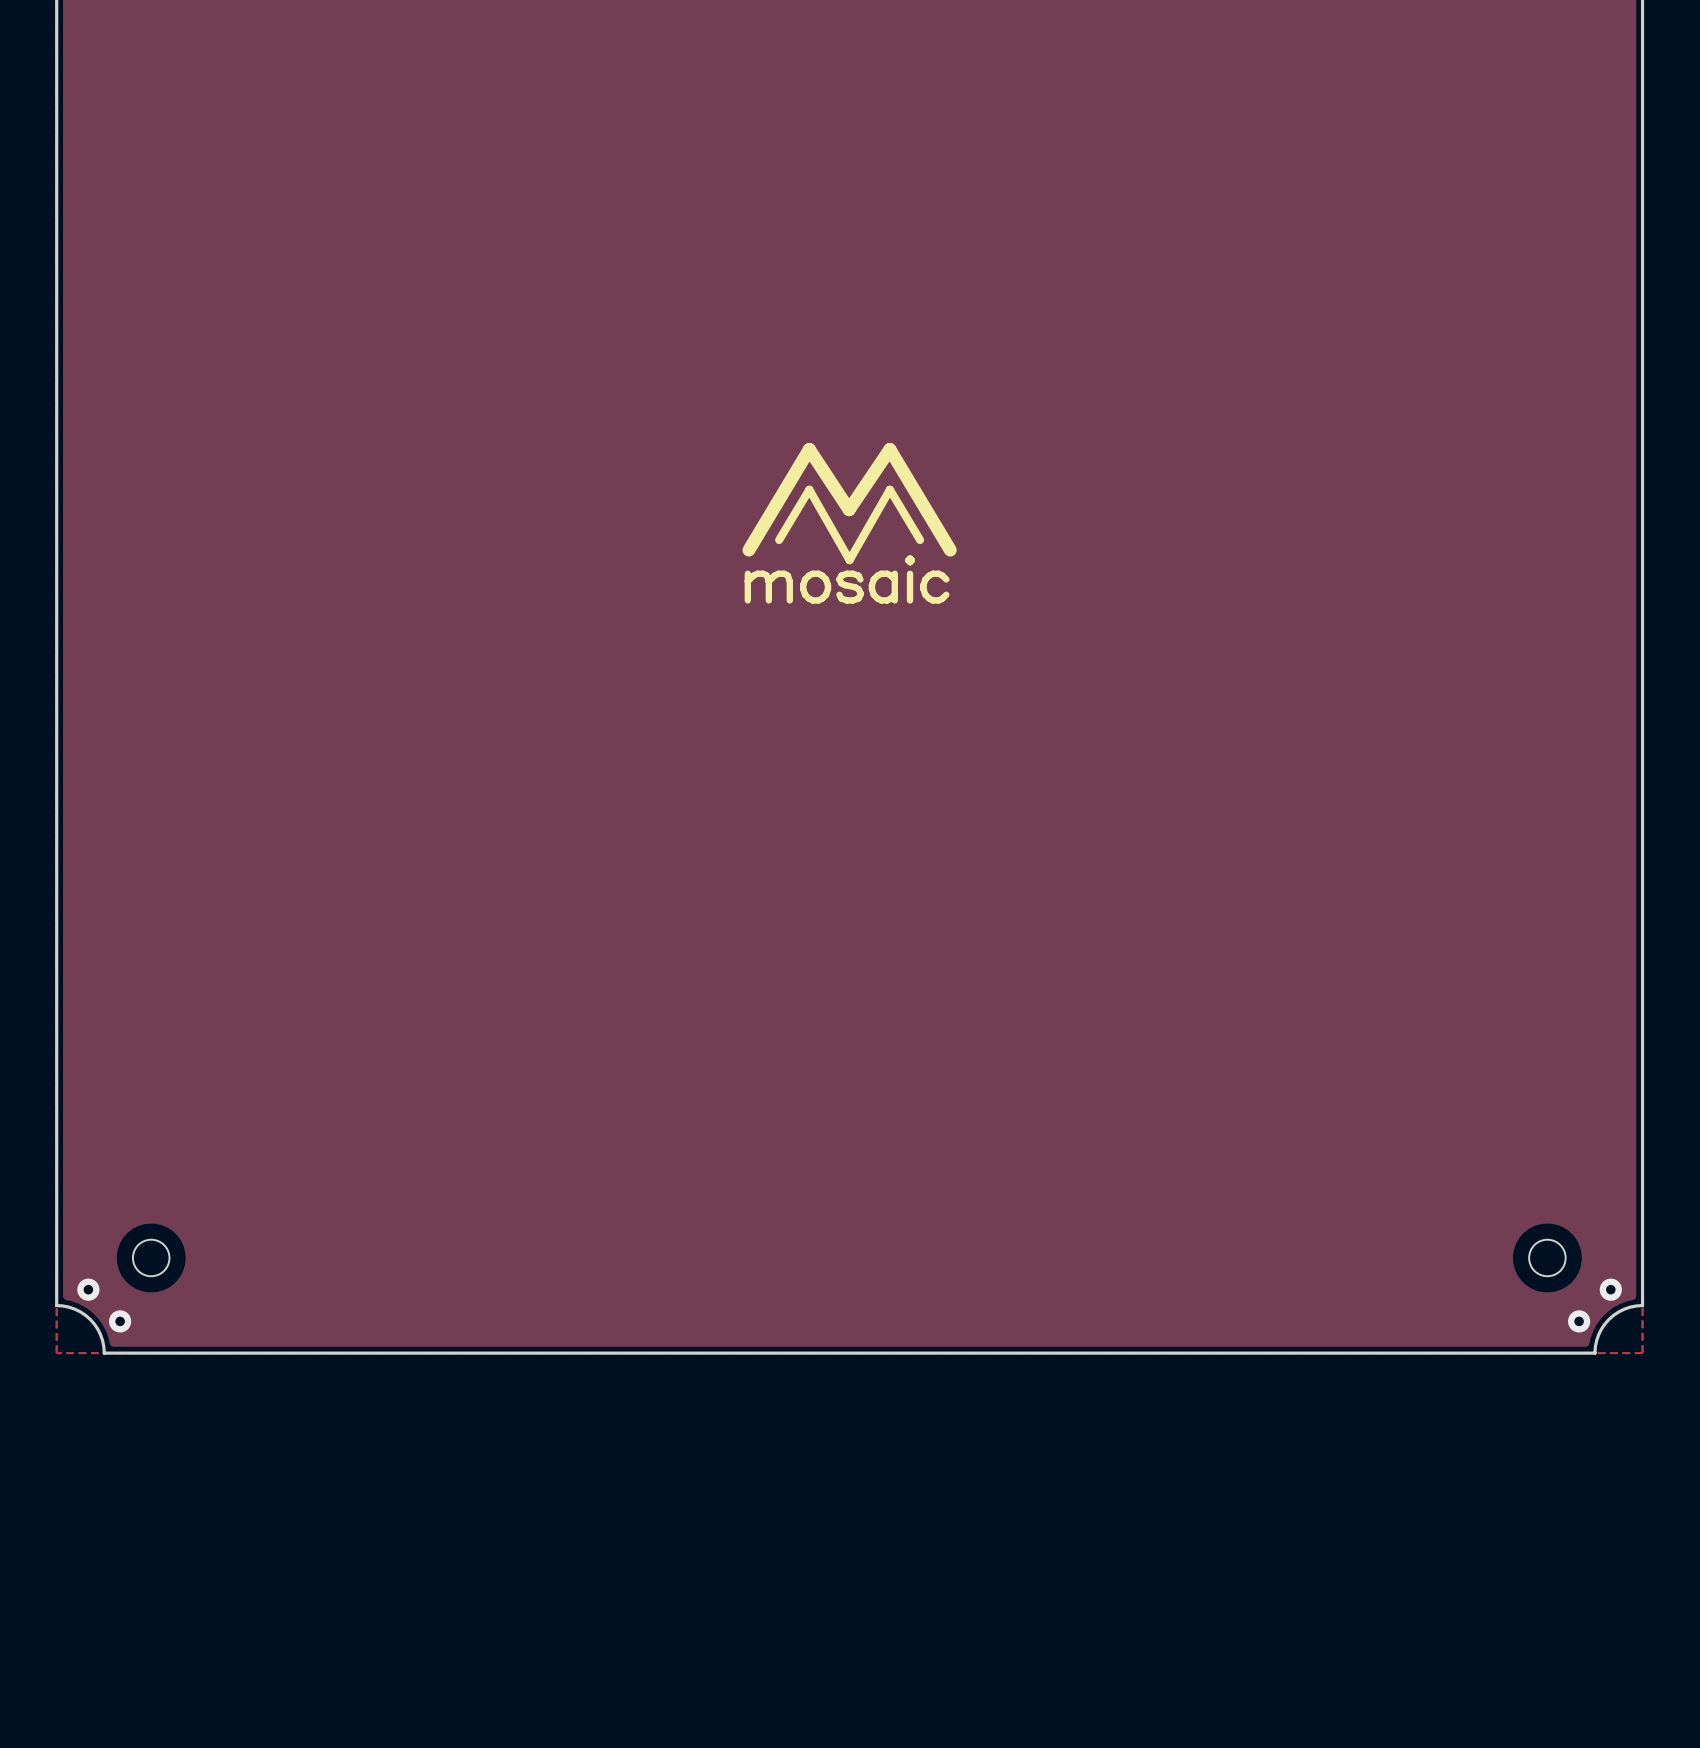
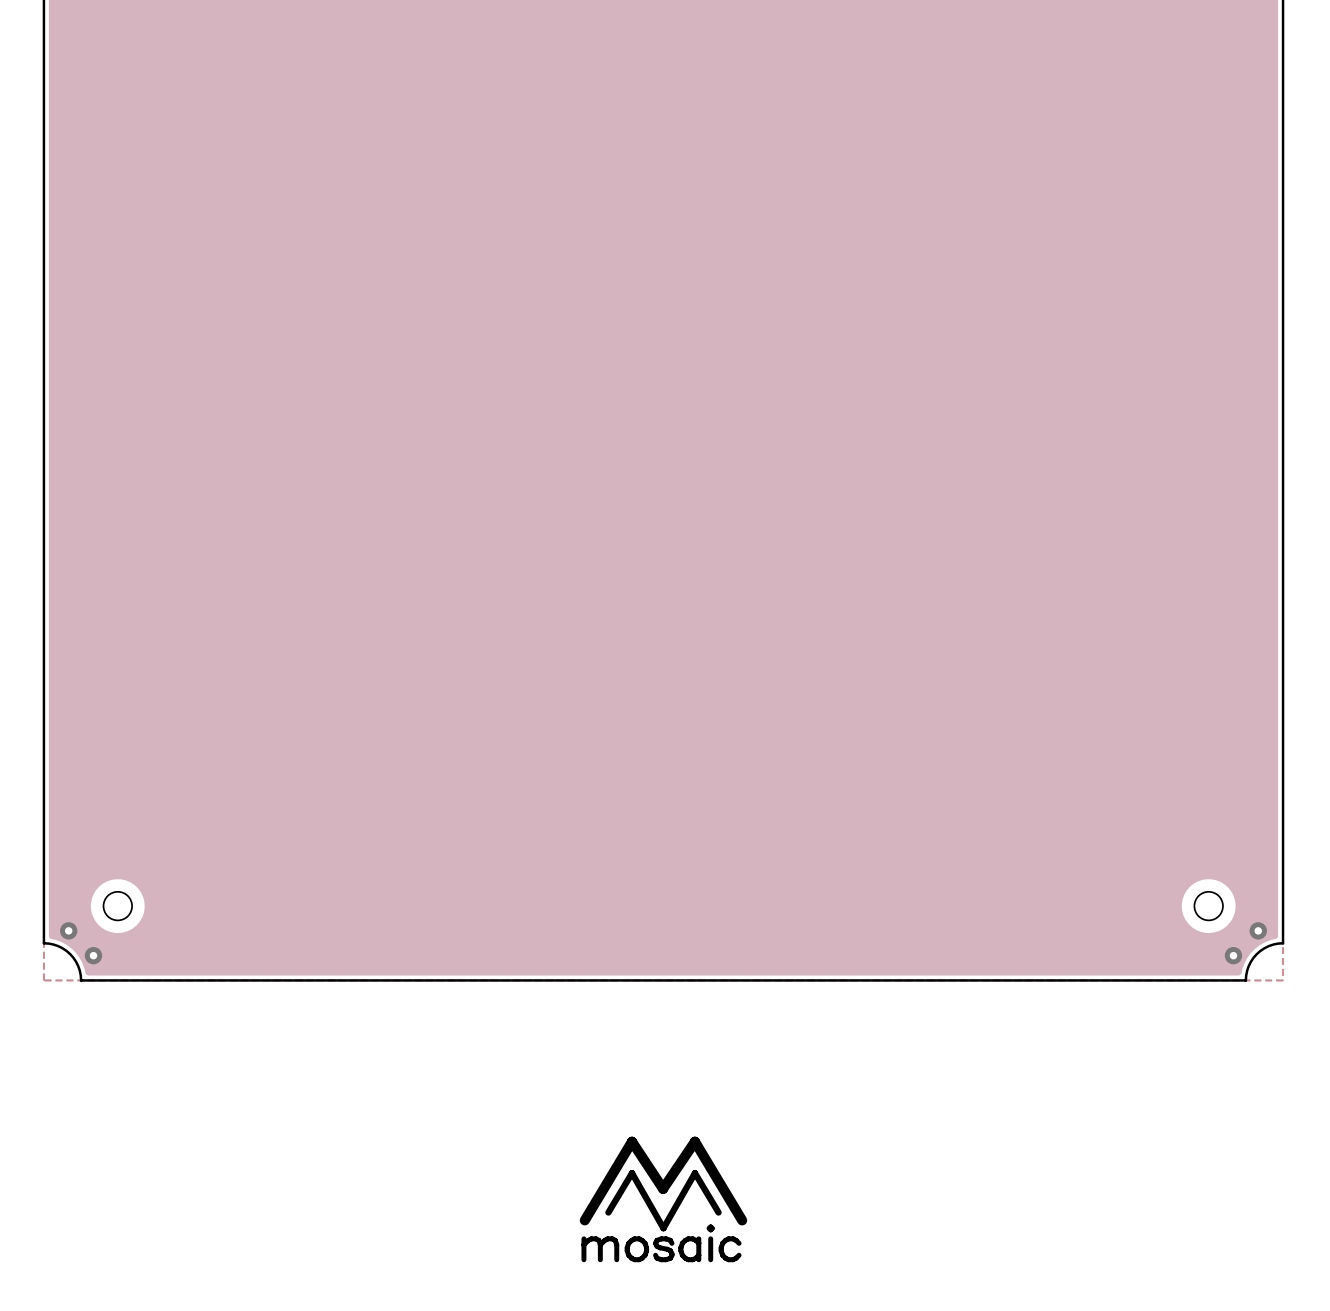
drawing: [742, 442, 957, 604] -> none
drawing: none -> [579, 1136, 748, 1263]

